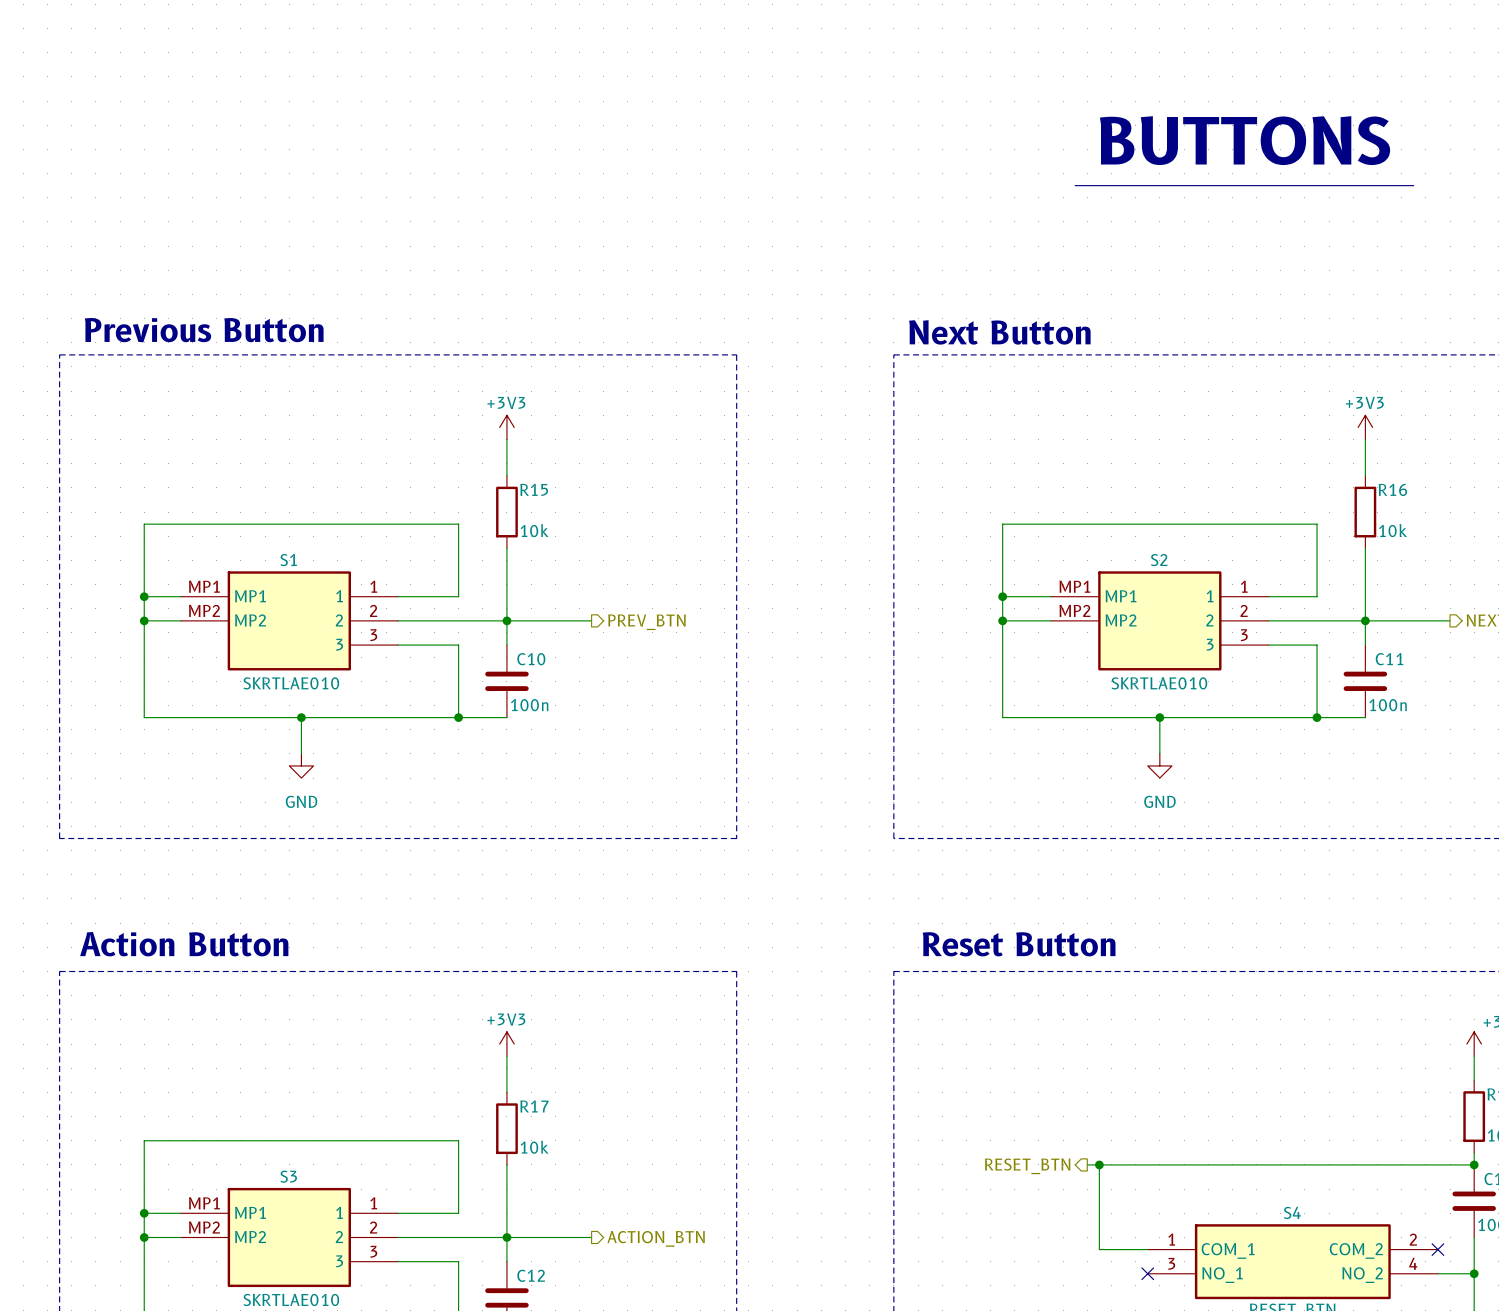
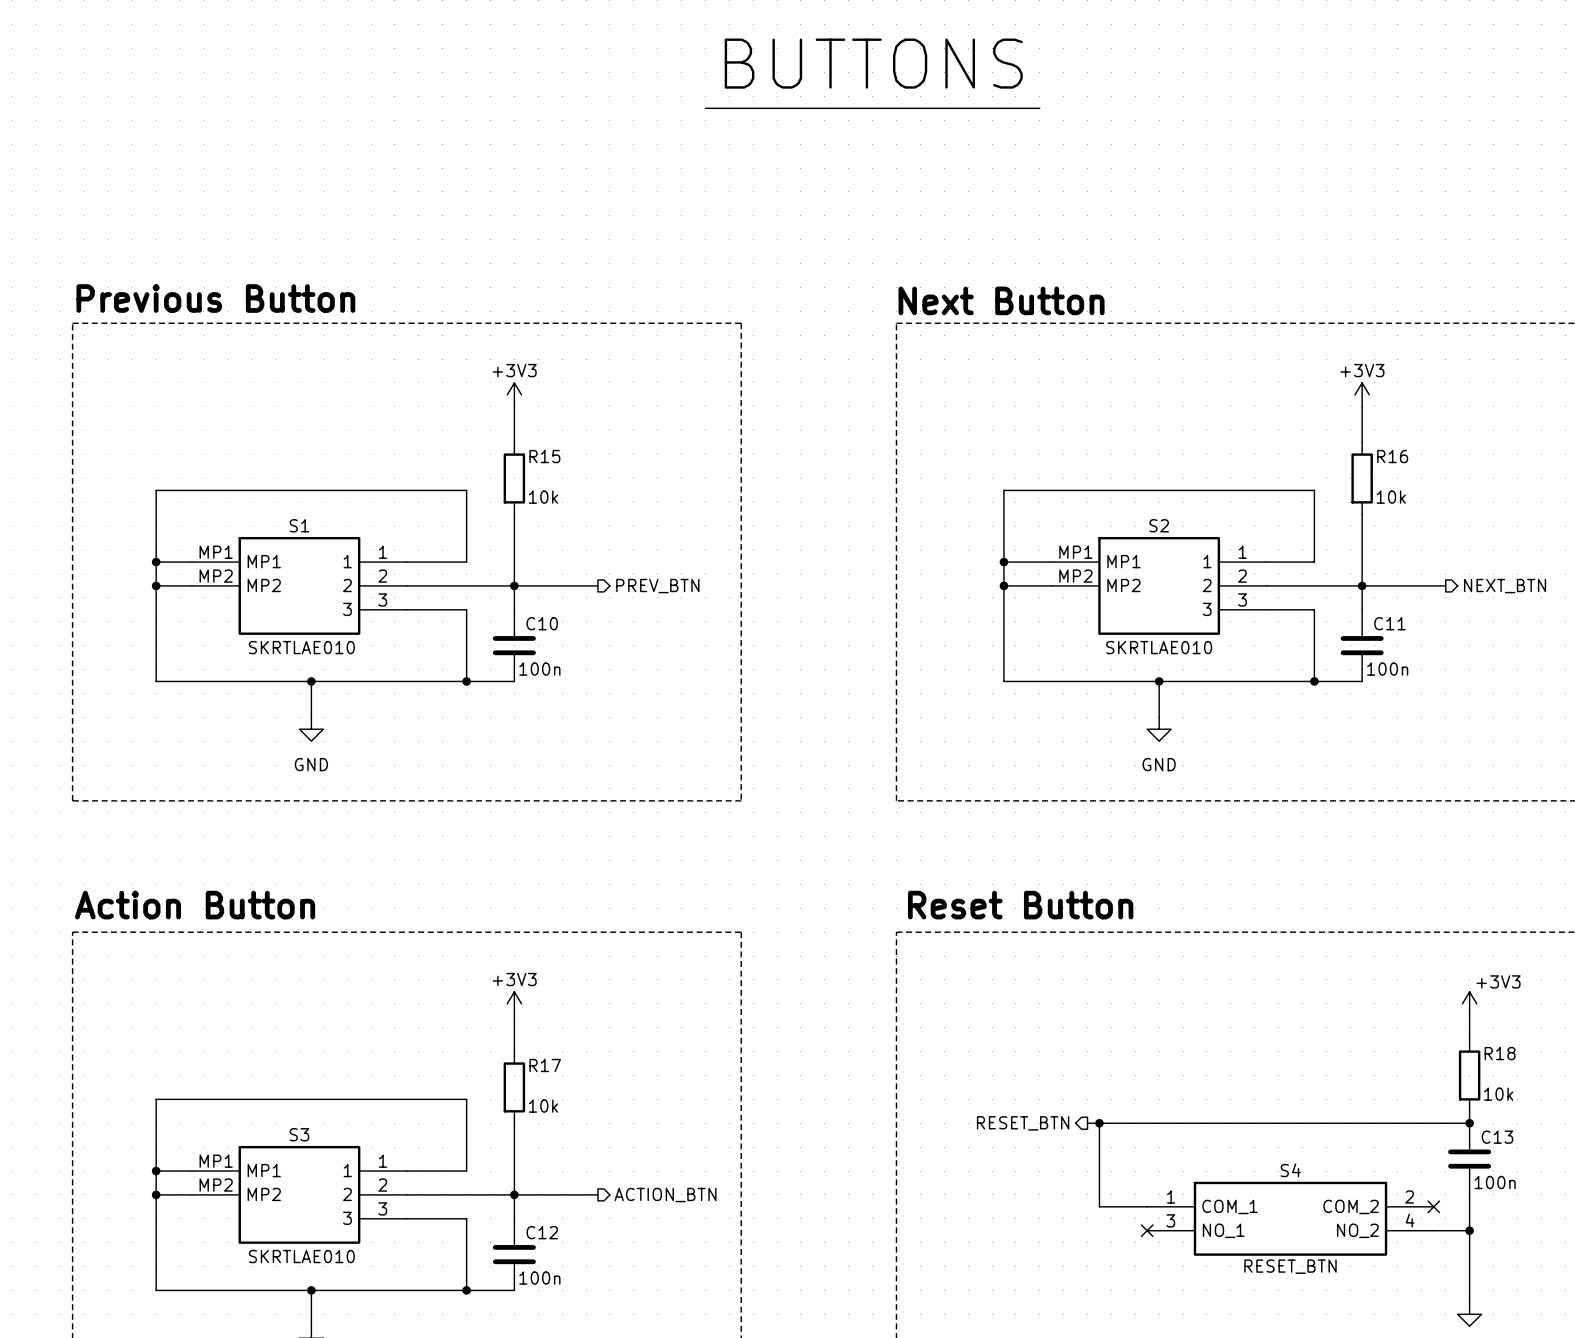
text: none -> BUTTONS (873, 63)
line: none -> (705, 108) (1039, 108)
text: BUTTONS (1245, 140) -> none
line: (1075, 185) (1413, 185) -> none

